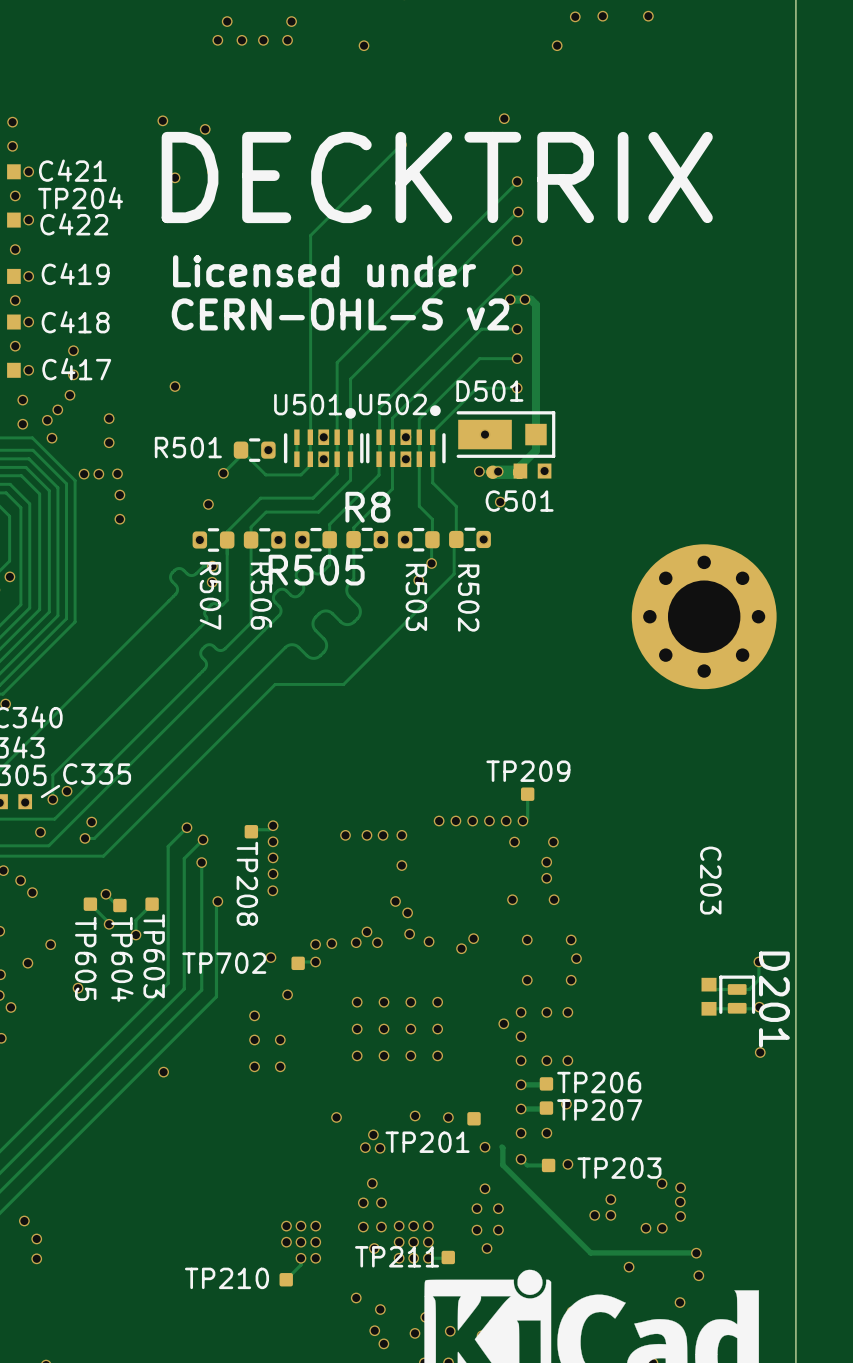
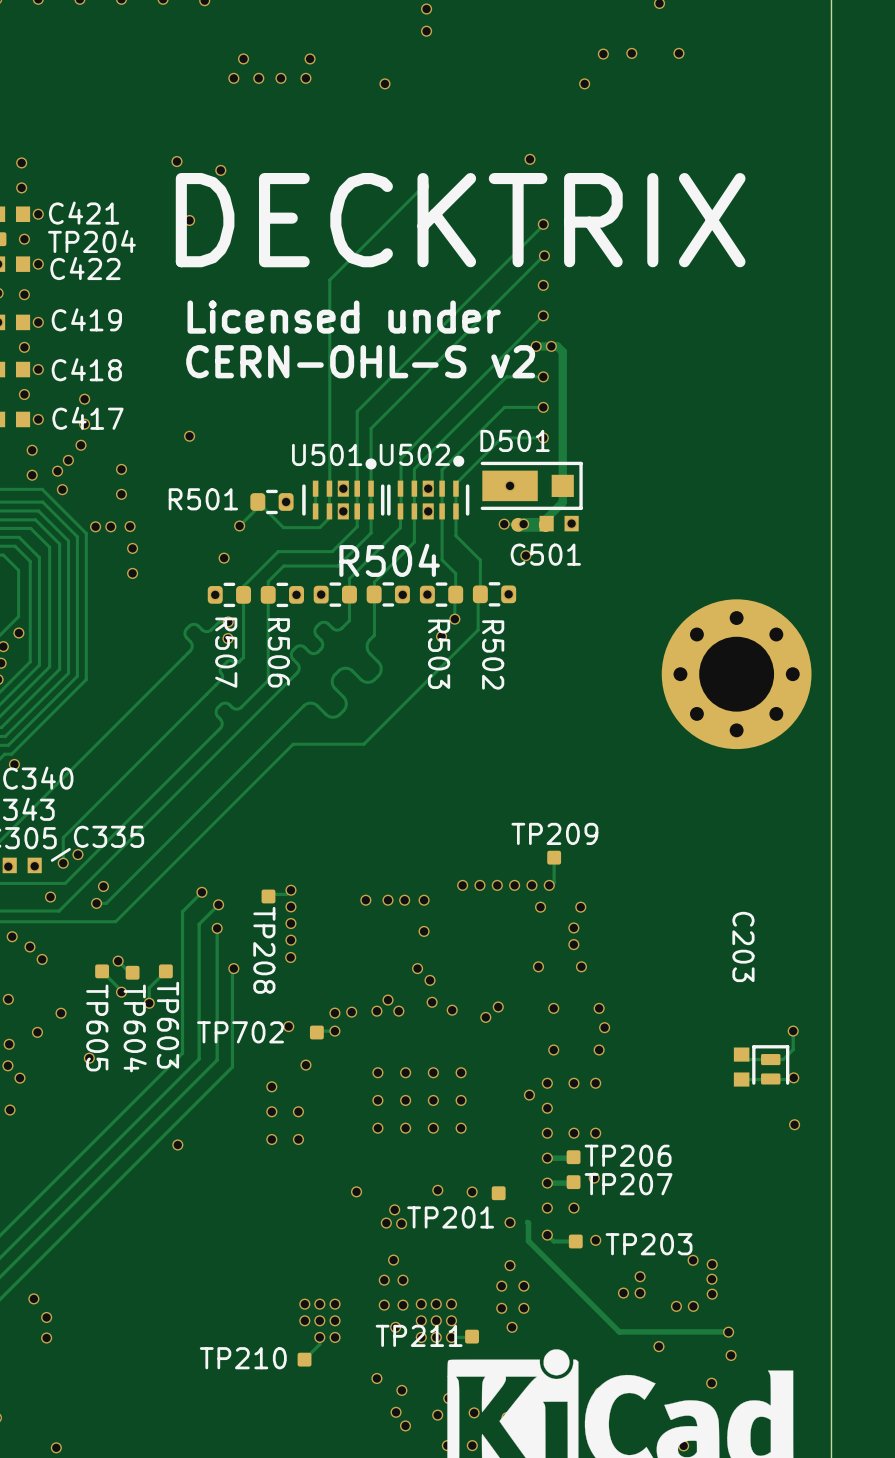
R8 name: R8 (367, 507) -> R504 (389, 560)
R505 name: R505 (316, 570) -> none
D201 name: D201 (774, 999) -> none

